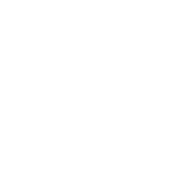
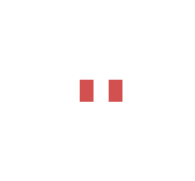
part: none -> (101, 90)

